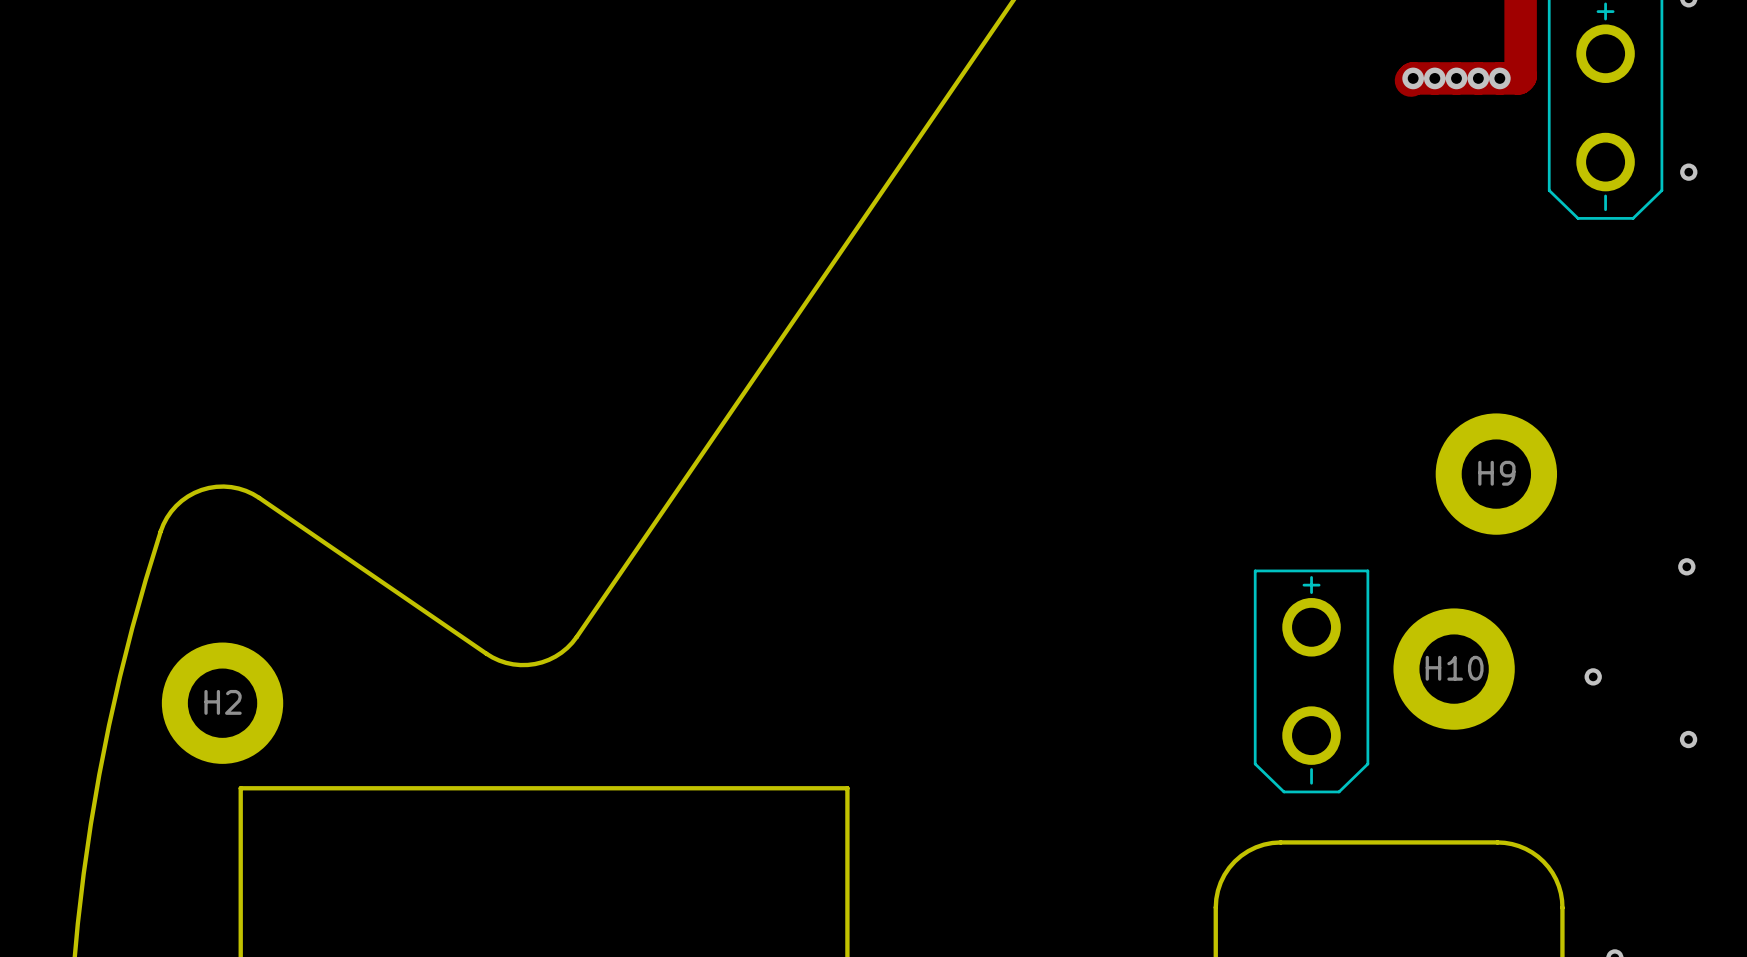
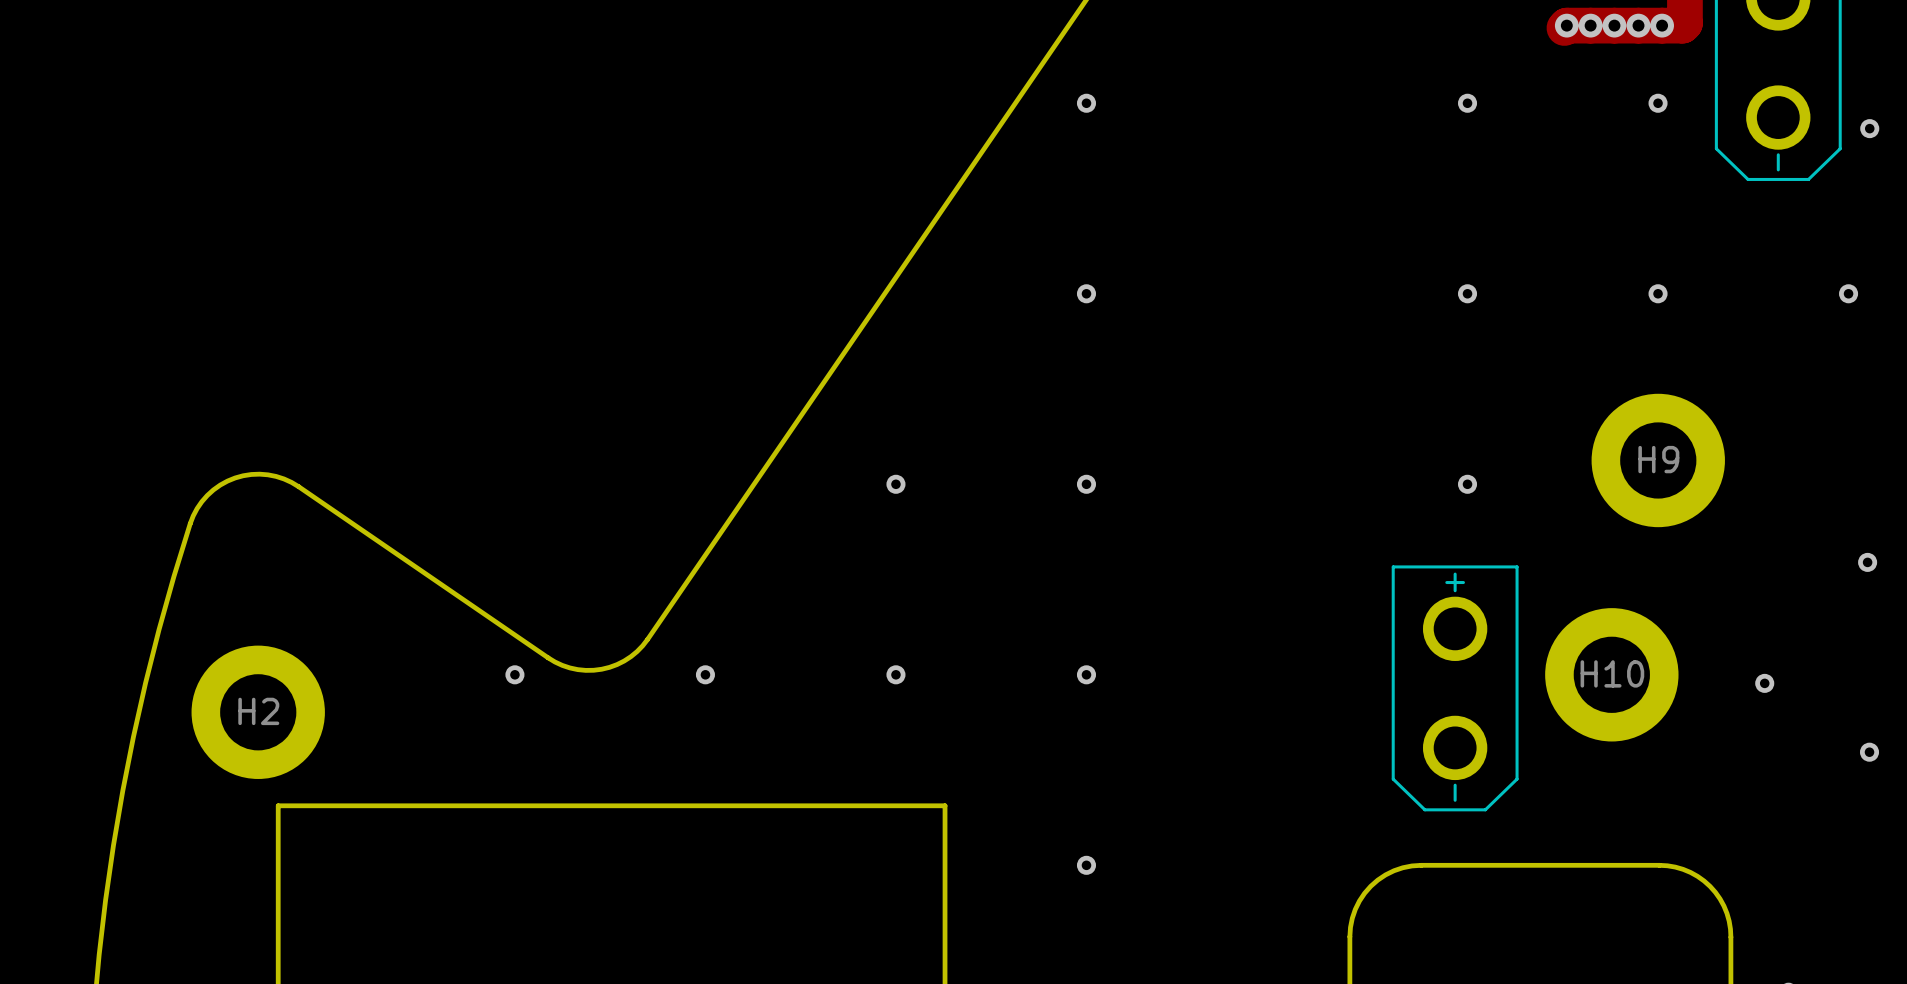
via: none -> (1086, 103)
via: none -> (1467, 103)
via: none -> (1658, 103)
via: none -> (1086, 293)
via: none -> (1467, 293)
via: none -> (1658, 293)
via: none -> (1848, 293)
via: none -> (895, 484)
via: none -> (1086, 484)
via: none -> (1467, 484)
via: none -> (514, 674)
via: none -> (705, 674)
via: none -> (895, 674)
via: none -> (1086, 674)
via: none -> (1086, 865)

